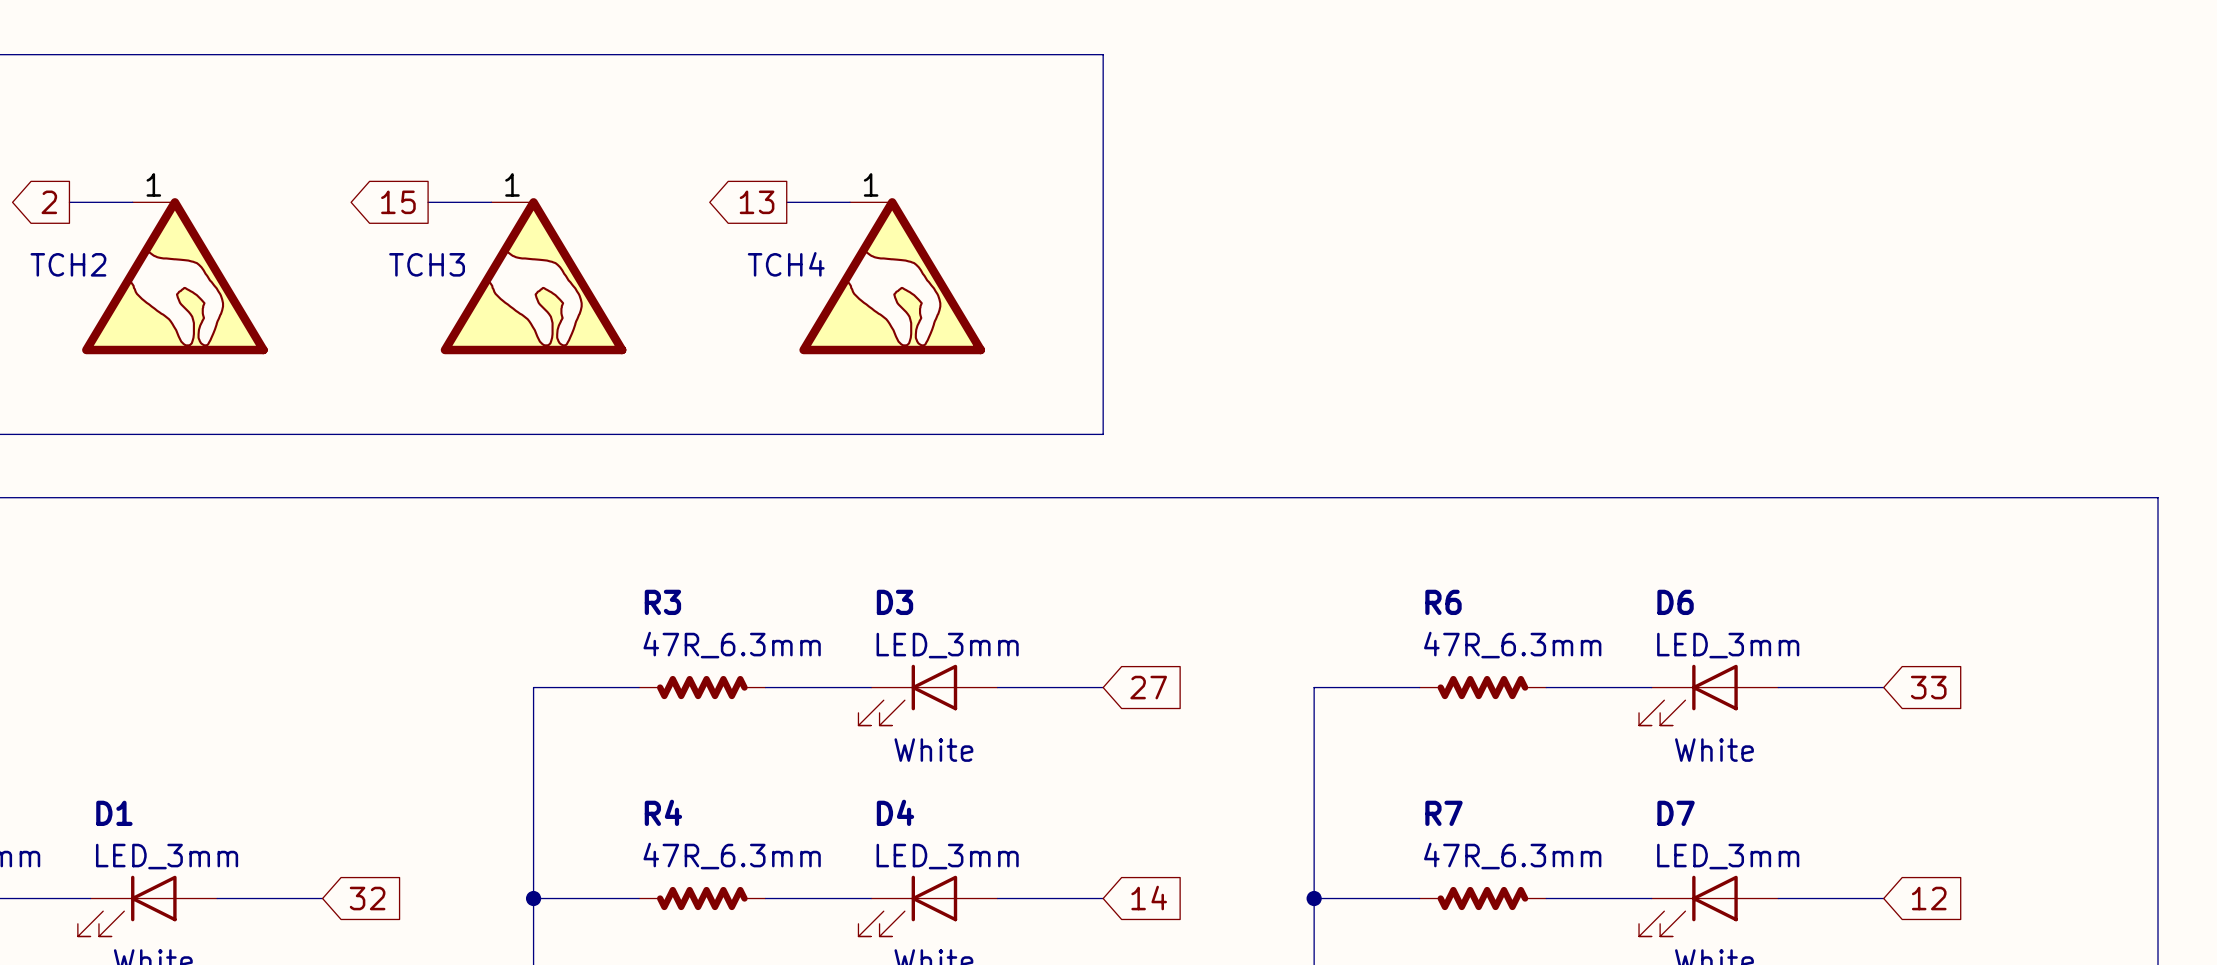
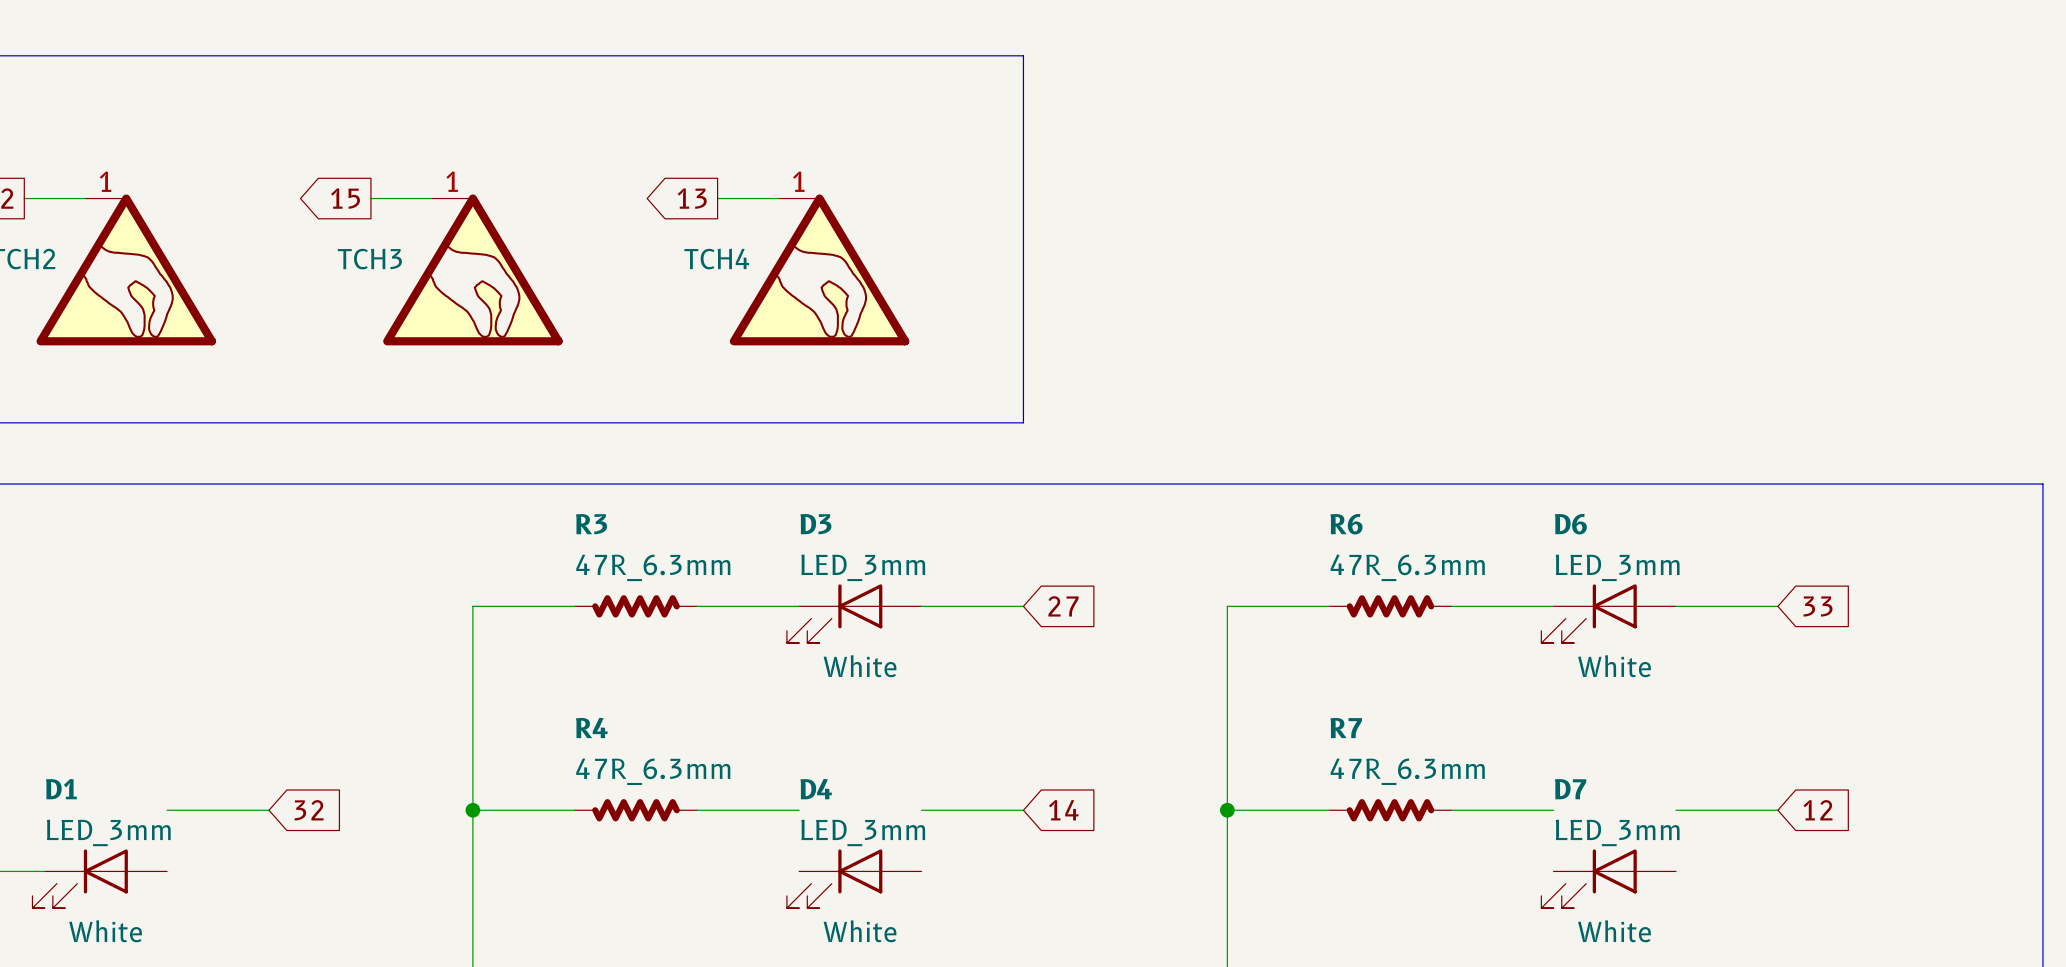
wire: (533, 687) (639, 687) -> (472, 667) (472, 606) (574, 606)
R3 position: (702, 687) -> (636, 606)
wire: (765, 687) (871, 687) -> (697, 606) (799, 606)
wire: (997, 687) (1103, 687) -> (921, 606) (1023, 606)
global label position: 27 (1148, 687) -> 27 (1063, 606)
wire: (1314, 687) (1419, 687) -> (1227, 667) (1227, 606) (1329, 606)
R6 position: (1482, 687) -> (1390, 606)
wire: (1546, 687) (1651, 687) -> (1451, 606) (1553, 606)
wire: (1778, 687) (1883, 687) -> (1675, 606) (1777, 606)
global label position: 33 (1928, 687) -> 33 (1817, 606)
D3 position: (928, 695) -> (854, 613)
D6 position: (1708, 695) -> (1608, 613)
wire: (217, 898) (322, 898) -> (167, 810) (269, 810)
global label position: 32 (367, 898) -> 32 (309, 810)
wire: (533, 898) (639, 898) -> (472, 810) (574, 810)
junction position: (533, 898) -> (472, 810)
R4 position: (702, 898) -> (636, 810)
wire: (765, 898) (871, 898) -> (697, 810) (799, 810)
wire: (997, 898) (1103, 898) -> (921, 810) (1023, 810)
global label position: 14 (1149, 898) -> 14 (1063, 810)
wire: (1314, 898) (1419, 898) -> (1227, 810) (1329, 810)
junction position: (1314, 898) -> (1227, 810)
R7 position: (1482, 898) -> (1390, 810)
wire: (1546, 898) (1651, 898) -> (1451, 810) (1553, 810)
wire: (1778, 898) (1883, 898) -> (1675, 810) (1777, 810)
global label position: 12 (1929, 898) -> 12 (1817, 810)

